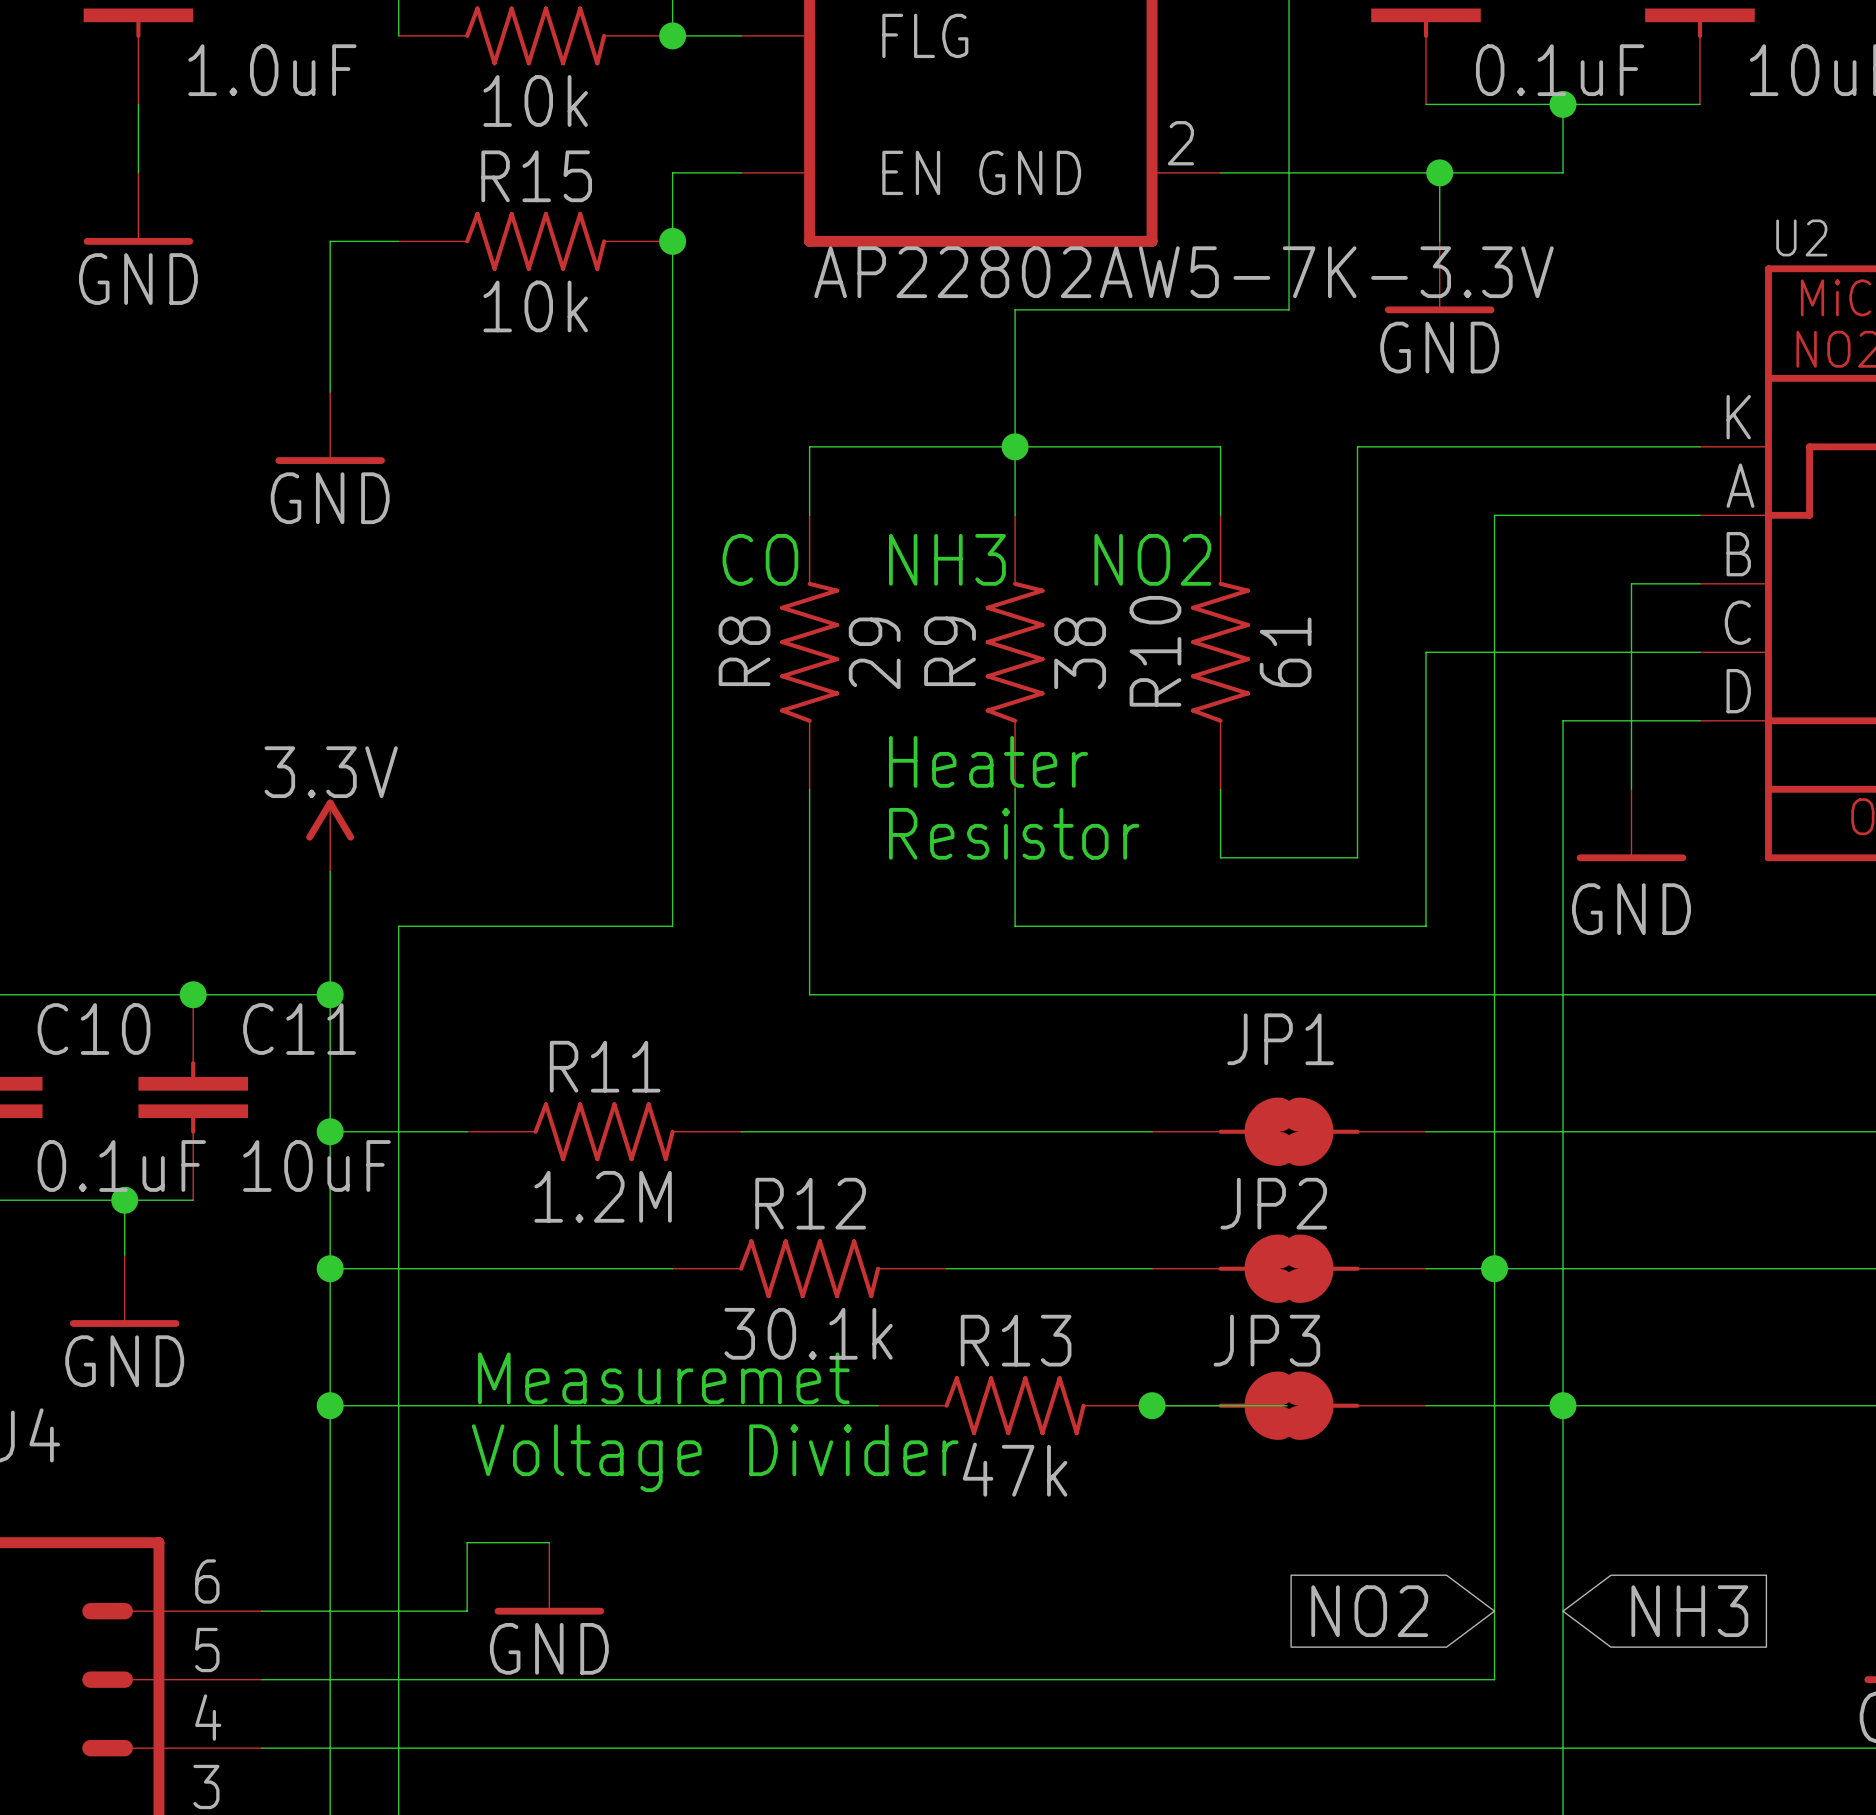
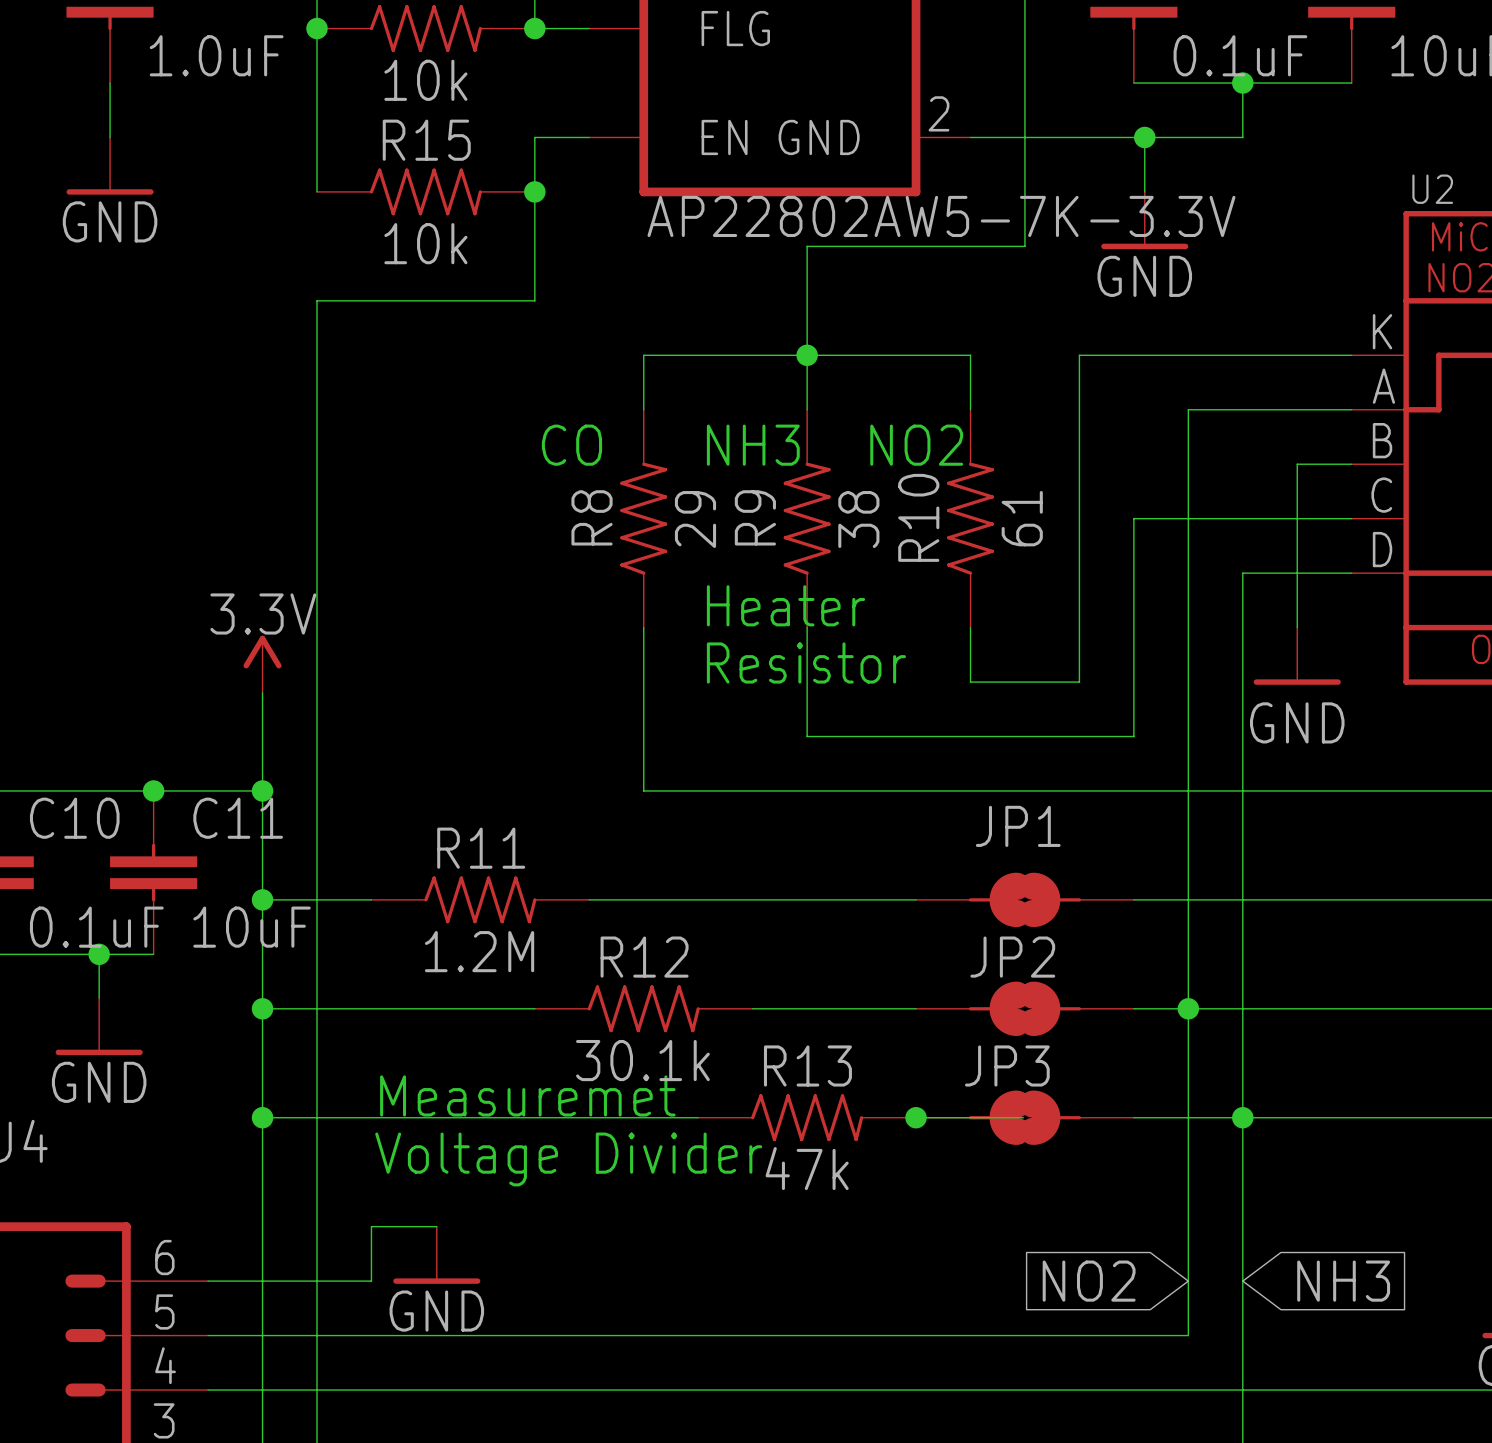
junction: none -> (317, 28)
wire: (398, 241) (330, 241) (330, 392) -> (317, 191) (317, 28)
wire: (672, 378) (672, 926) (398, 926) -> (534, 300) (317, 300) (317, 736)
power symbol: GND (330, 428) -> none
text position: CO (760, 559) -> CO (571, 445)

